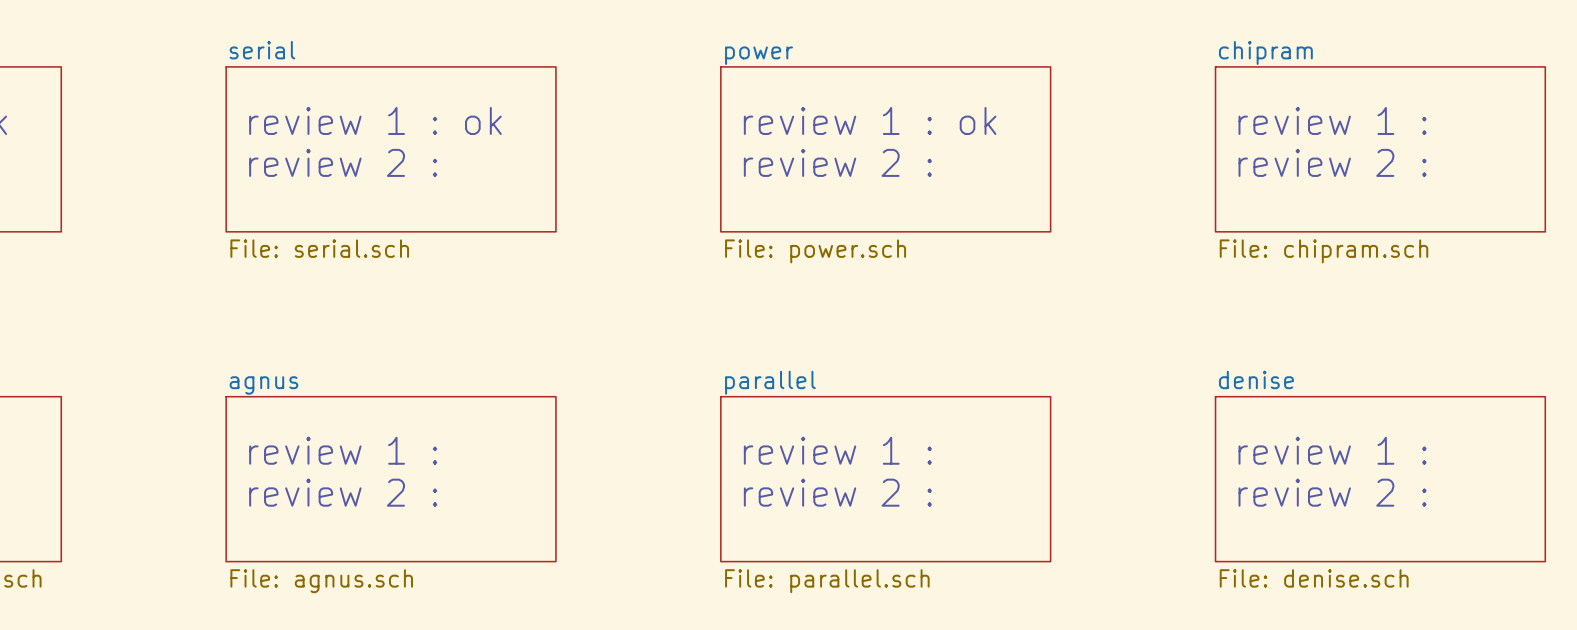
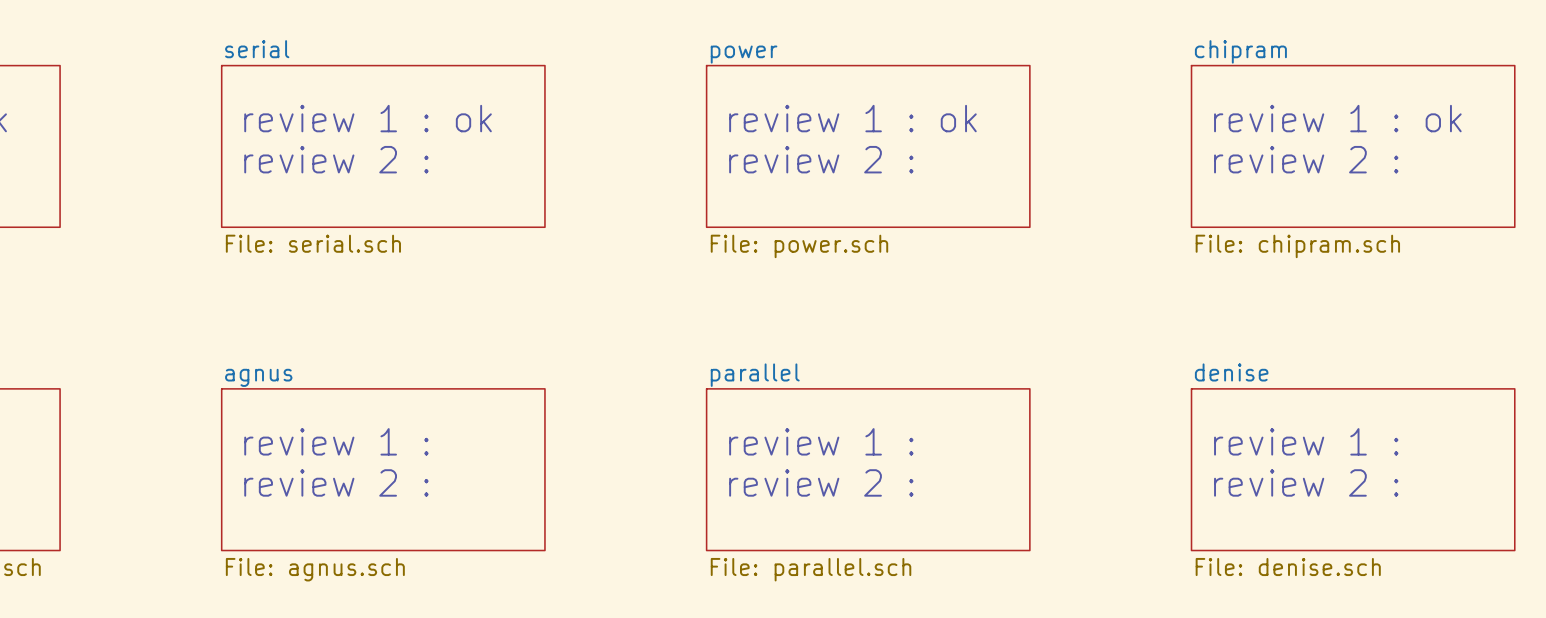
text: review 1 : (1332, 120) -> review 1 : ok (1337, 118)

